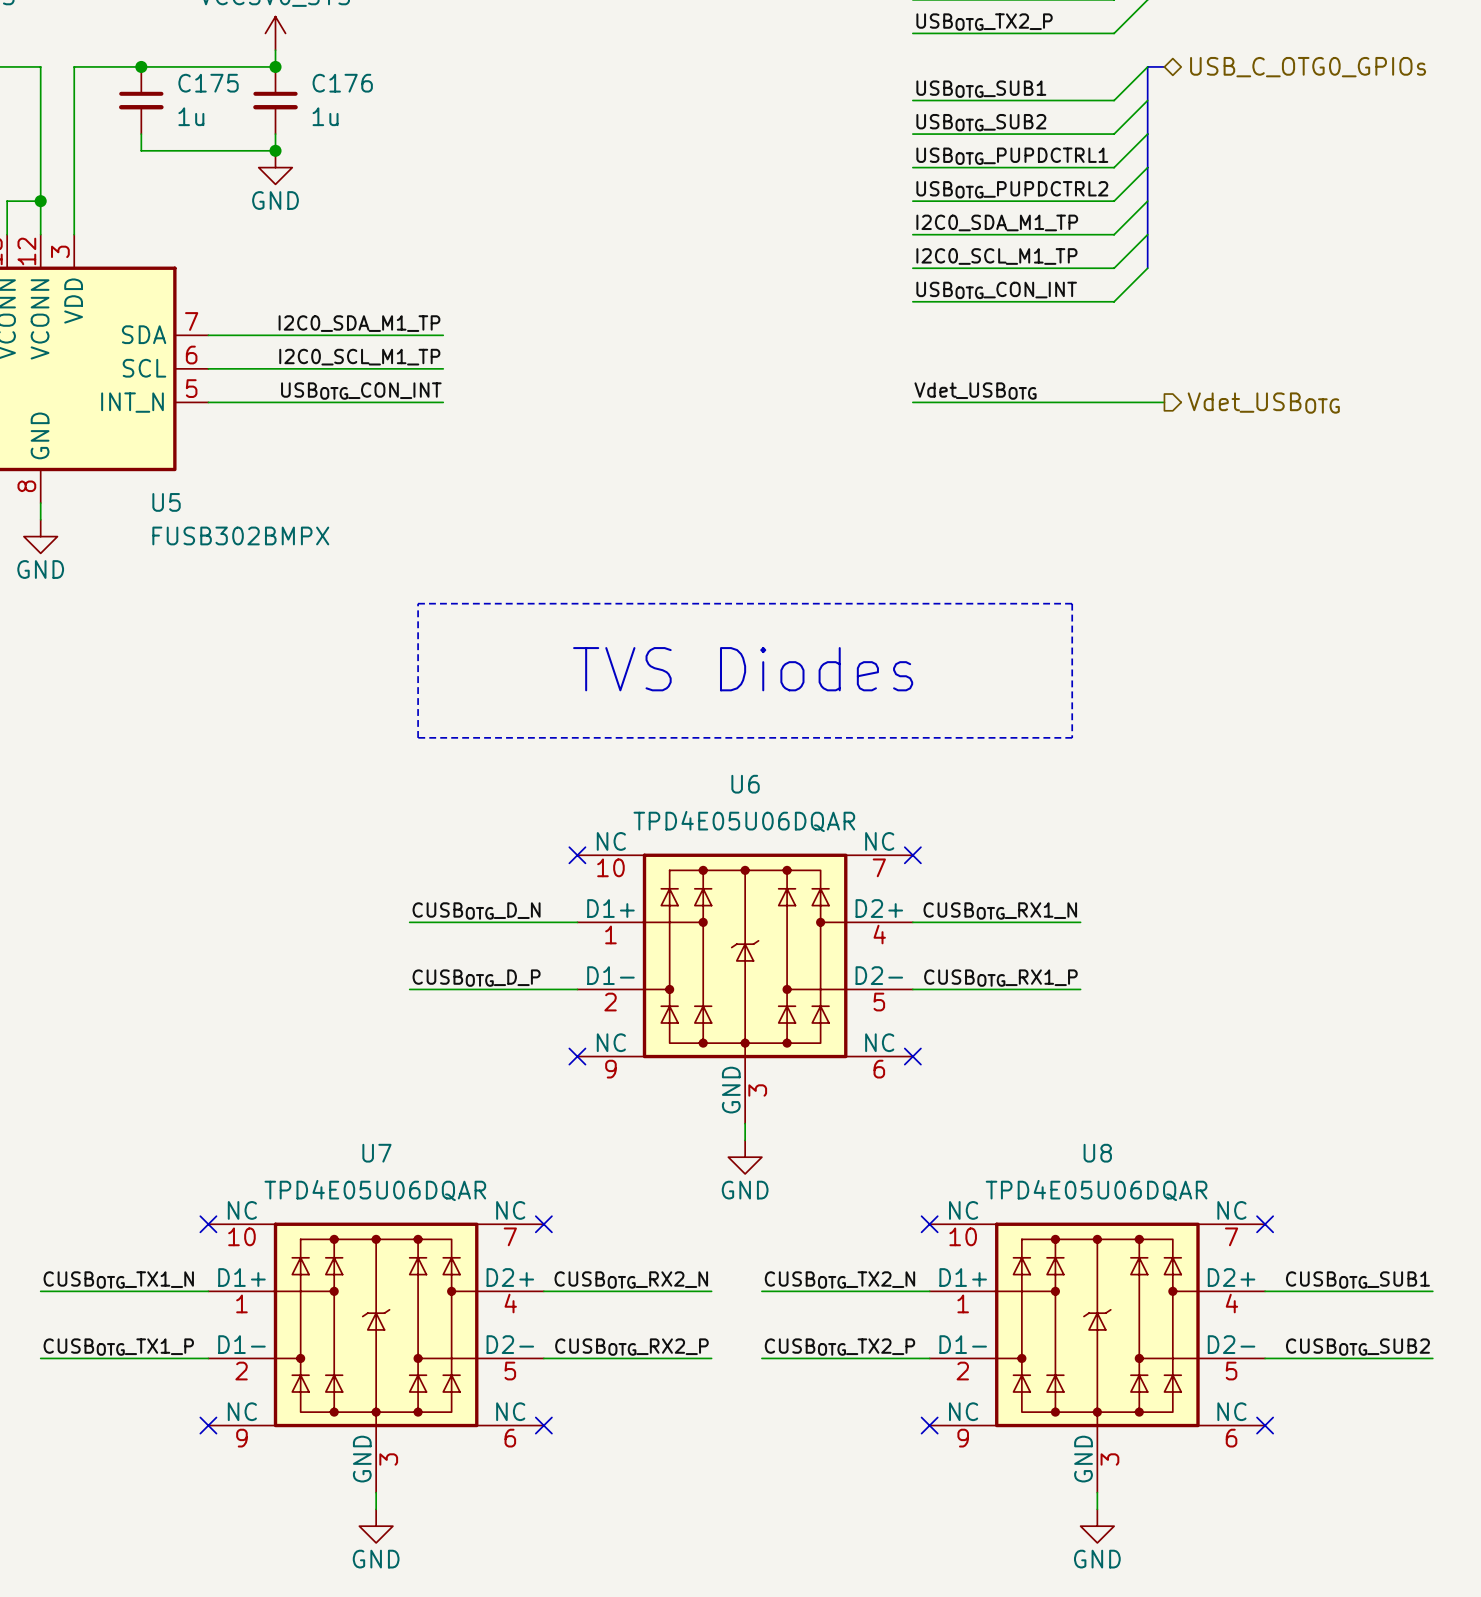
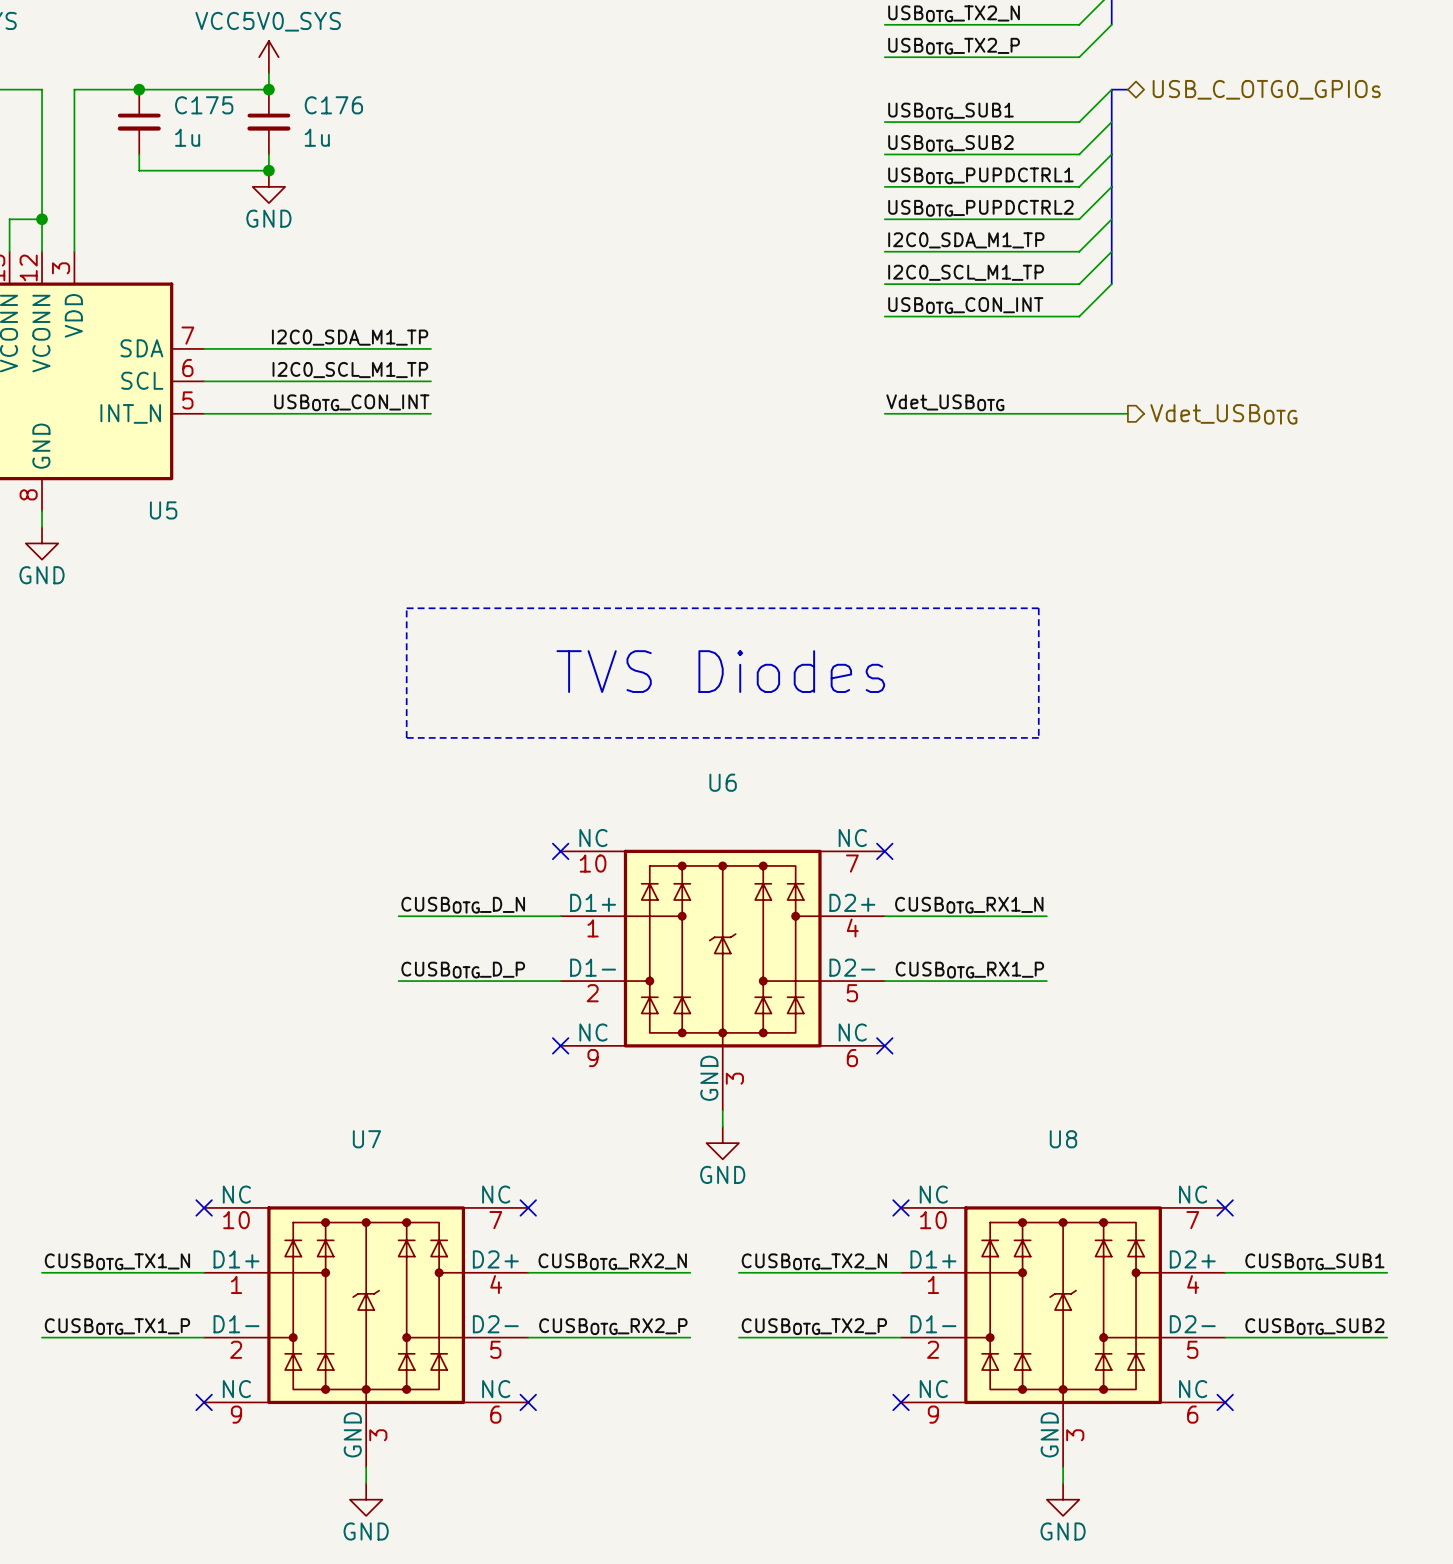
U5 value: FUSB302BMPX (240, 535) -> none
U6 value: TPD4E05U06DQAR (744, 821) -> none
U7 value: TPD4E05U06DQAR (375, 1190) -> none
U8 value: TPD4E05U06DQAR (1096, 1190) -> none

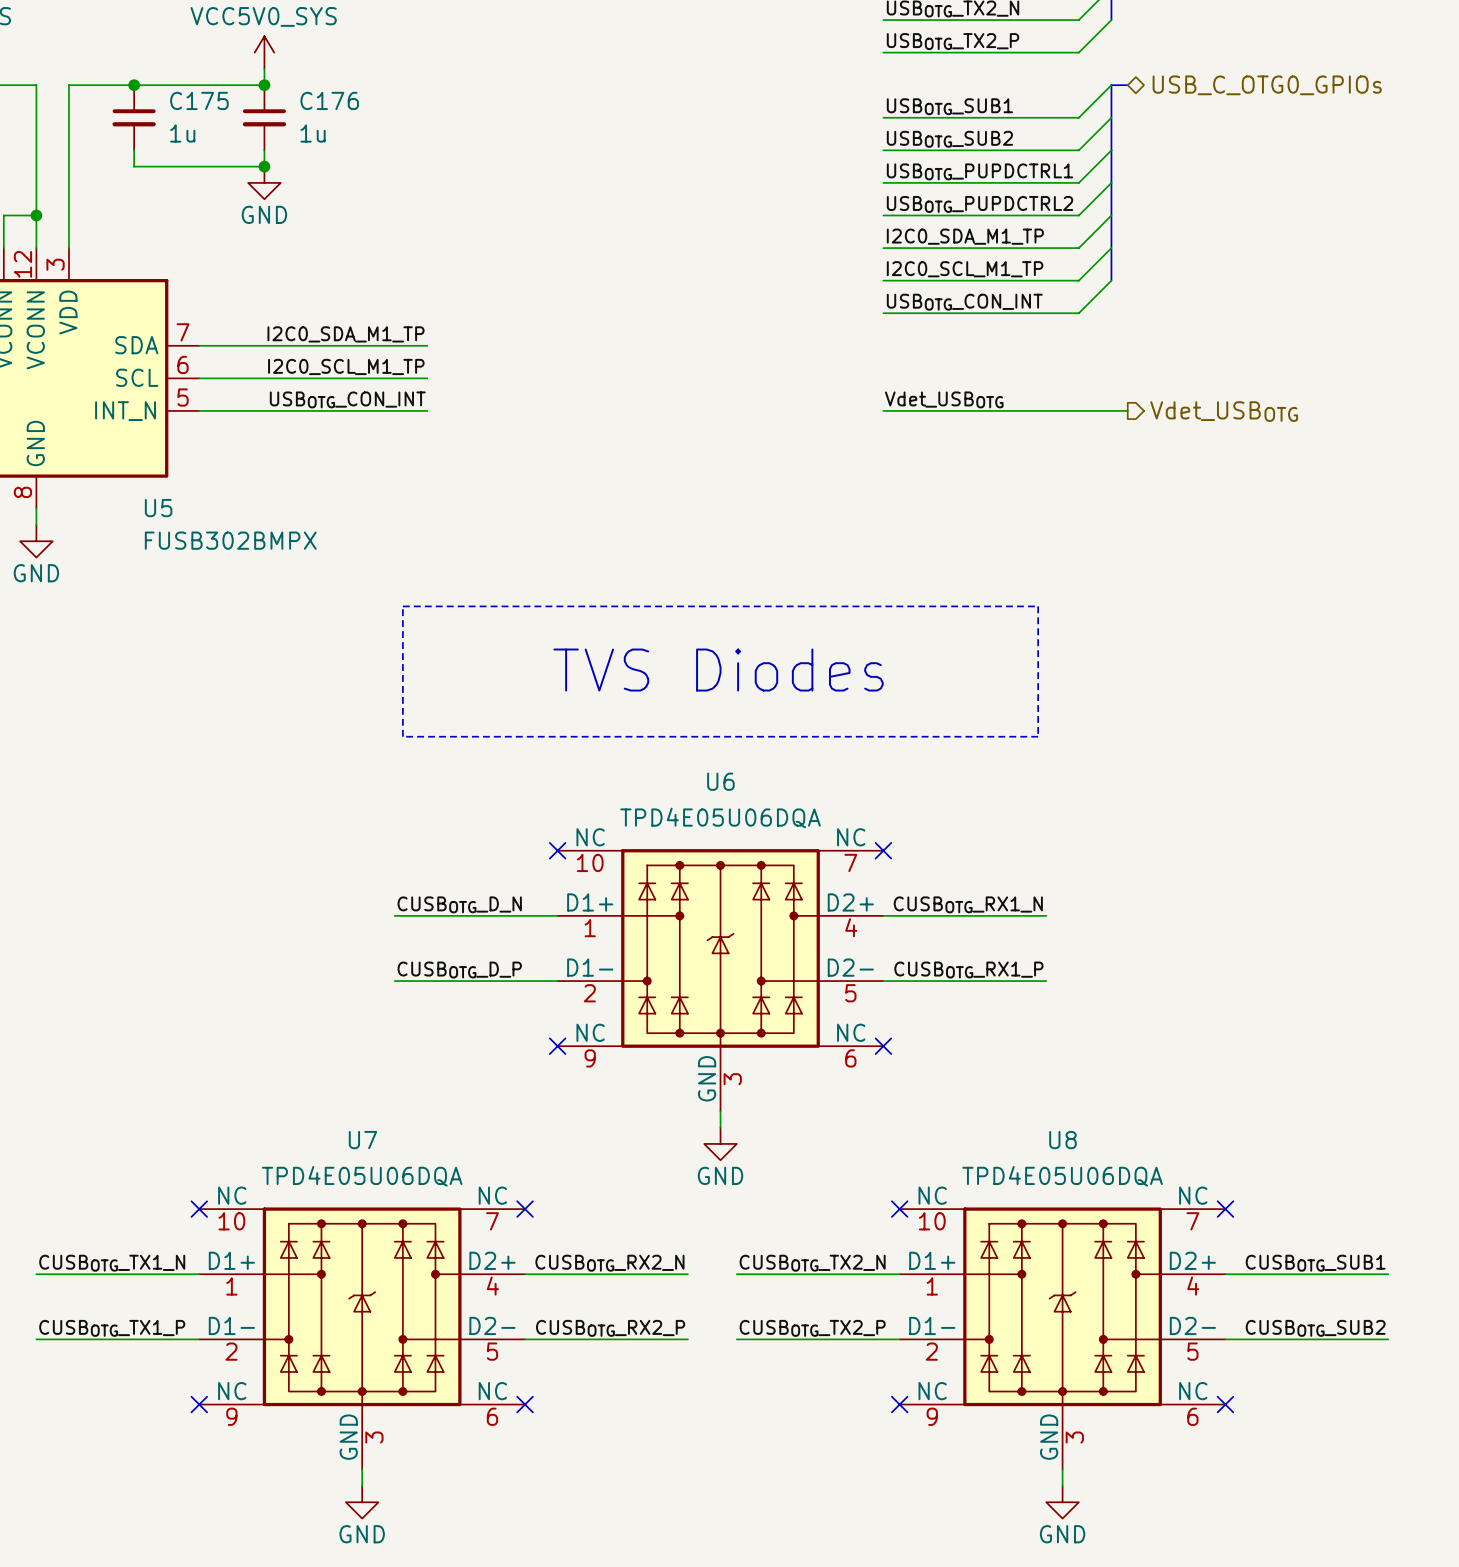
U5 value: none -> FUSB302BMPX (230, 540)
U6 value: none -> TPD4E05U06DQA (720, 817)
U7 value: none -> TPD4E05U06DQA (362, 1176)
U8 value: none -> TPD4E05U06DQA (1062, 1176)

